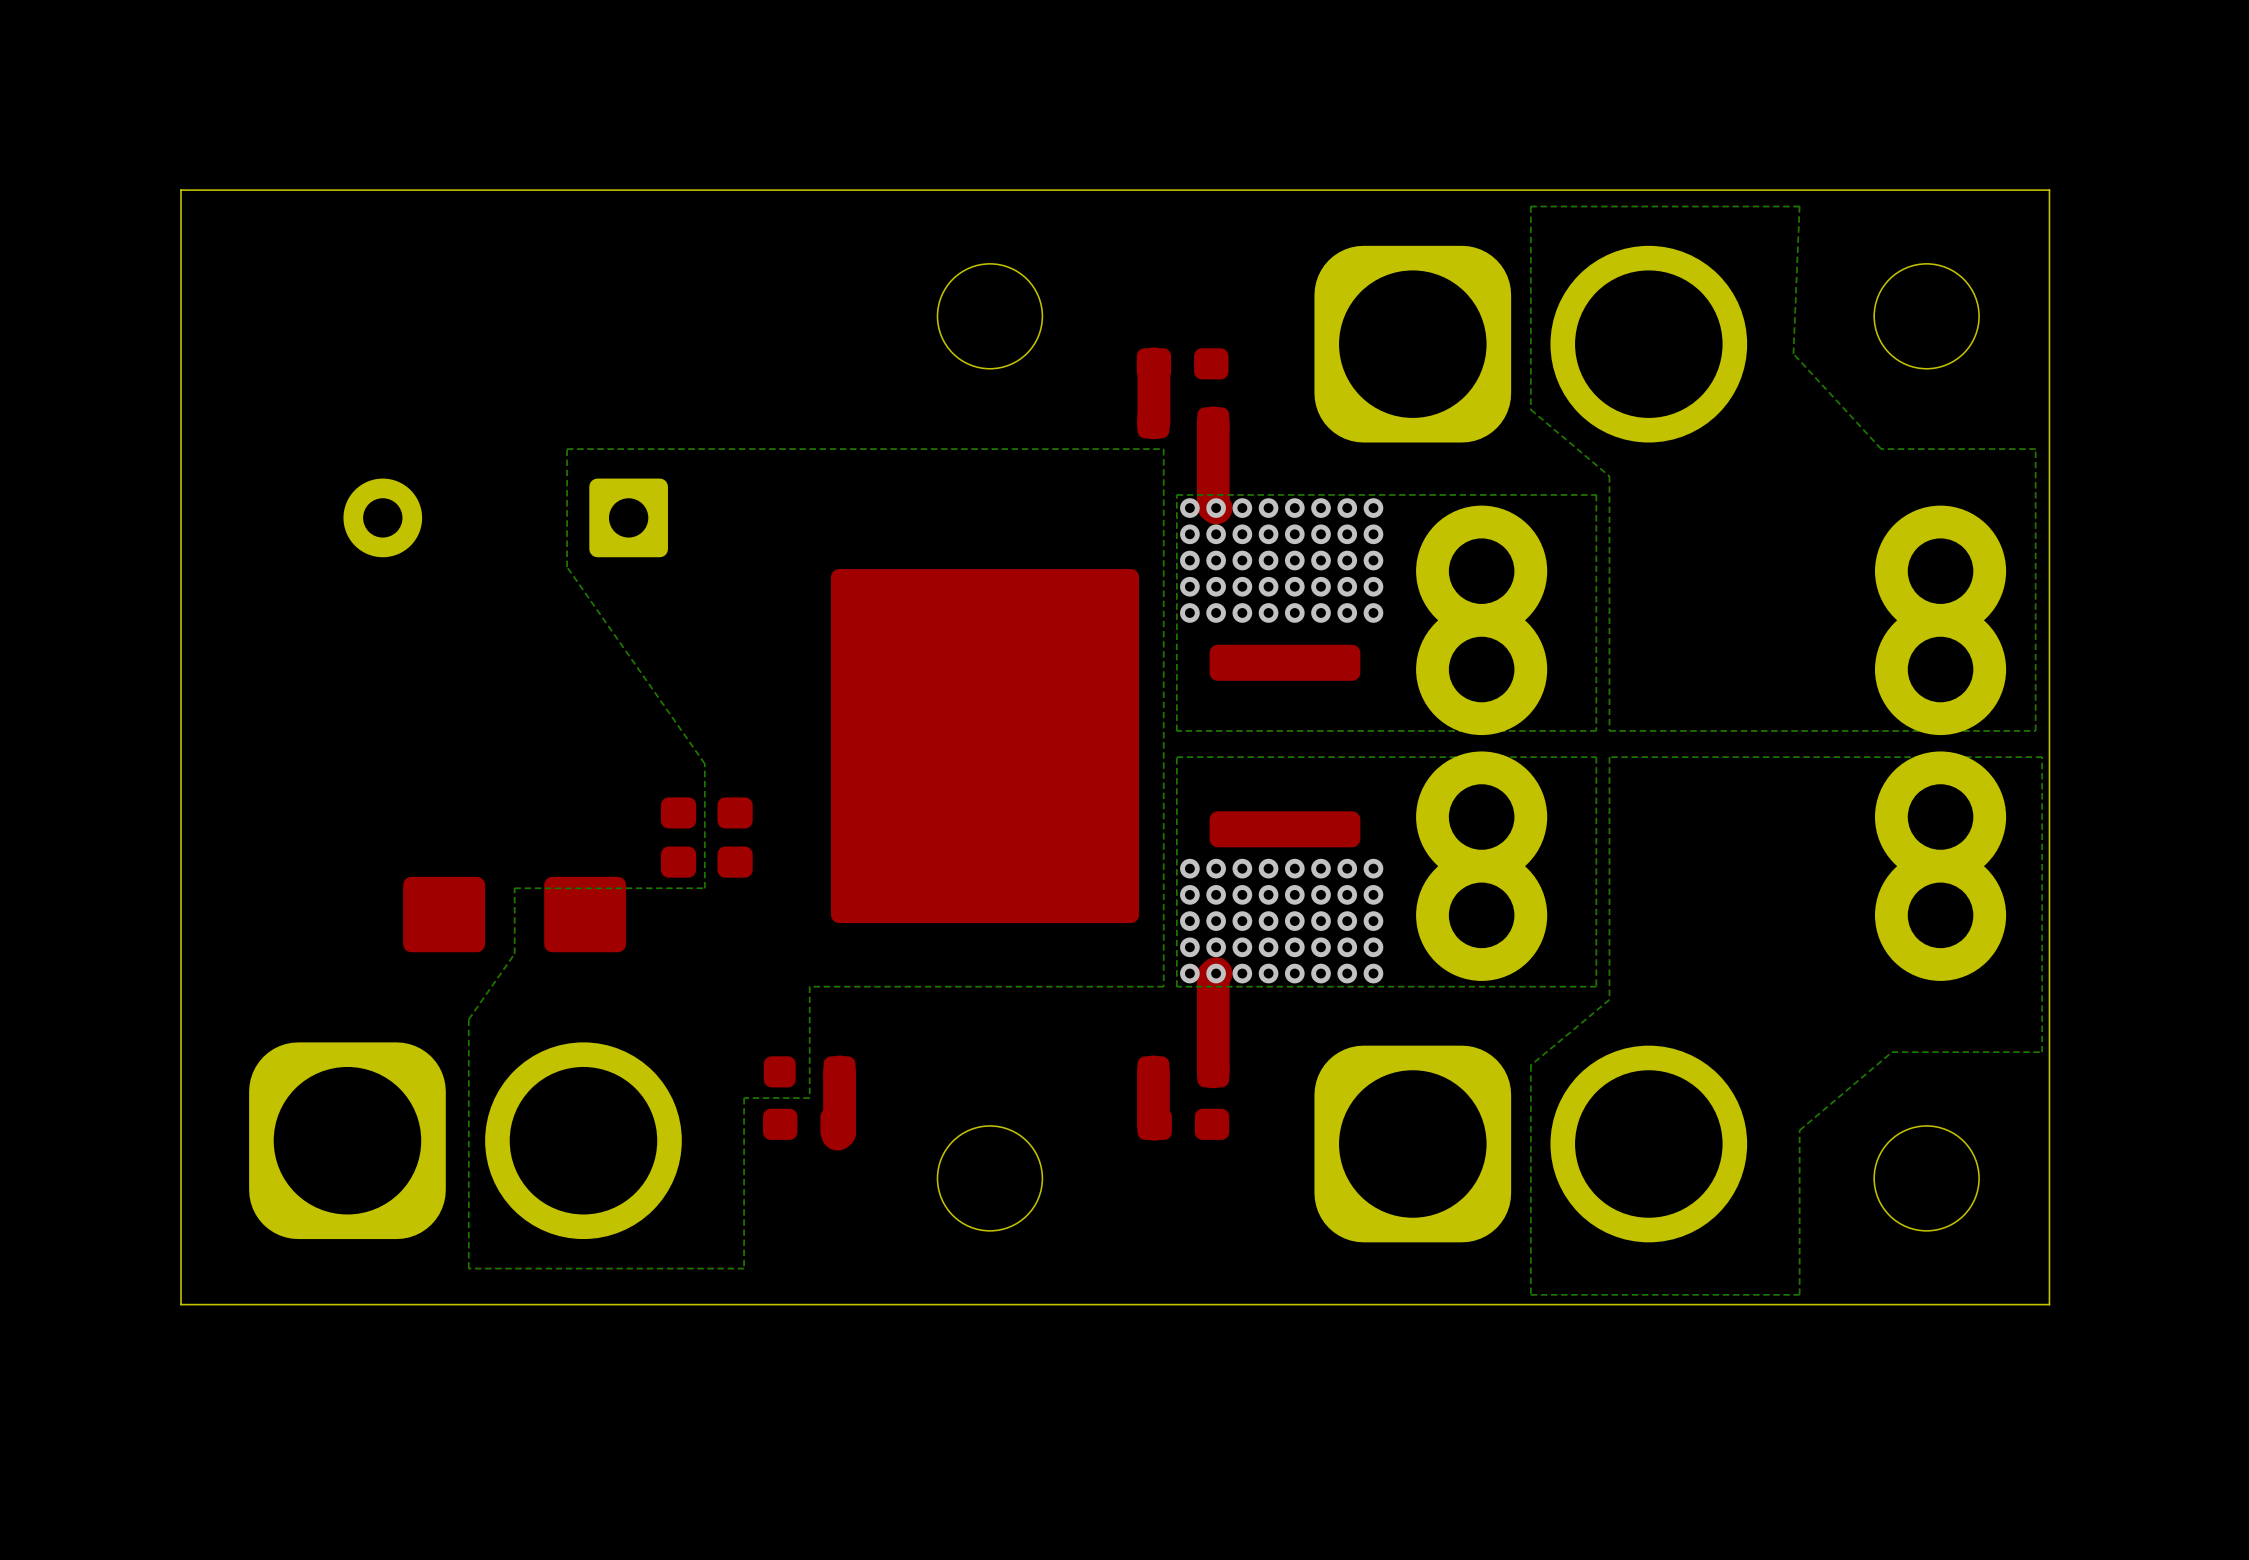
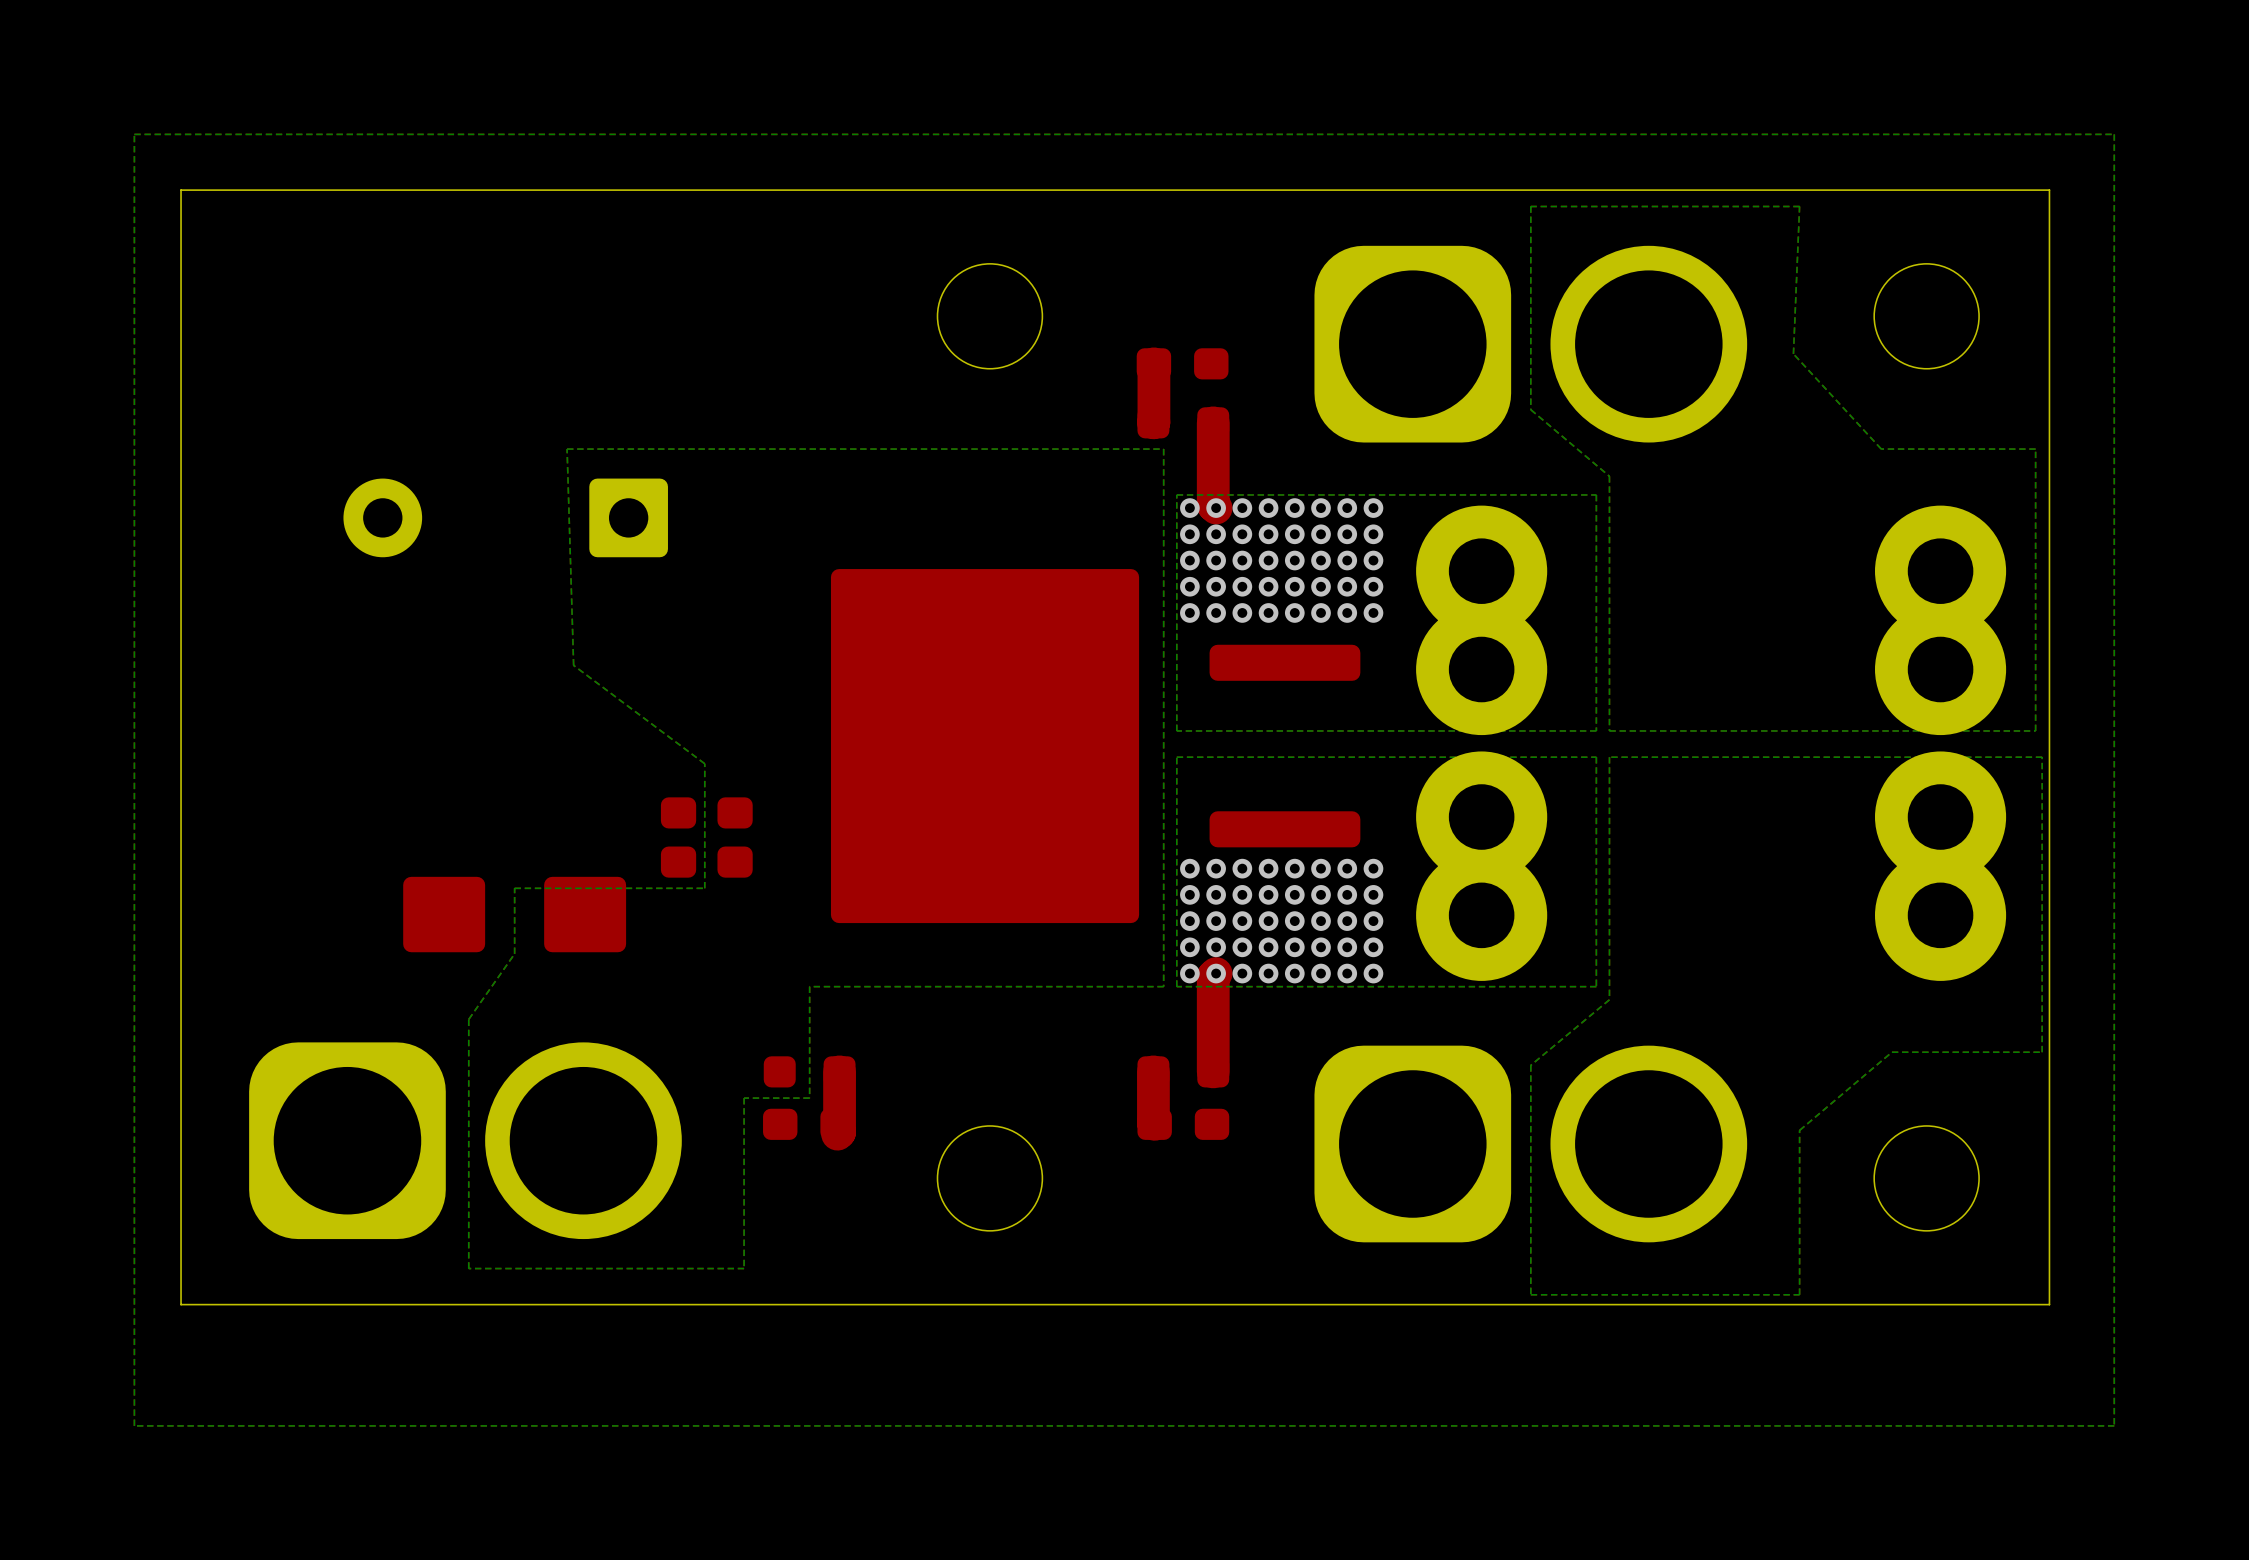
bottom zone outline: none -> (2114, 134) (2114, 1425) (134, 1425) (134, 134) (2114, 134)
bottom zone outline: (567, 449) (567, 567) (704, 763) -> (567, 449) (573, 665) (704, 763)

